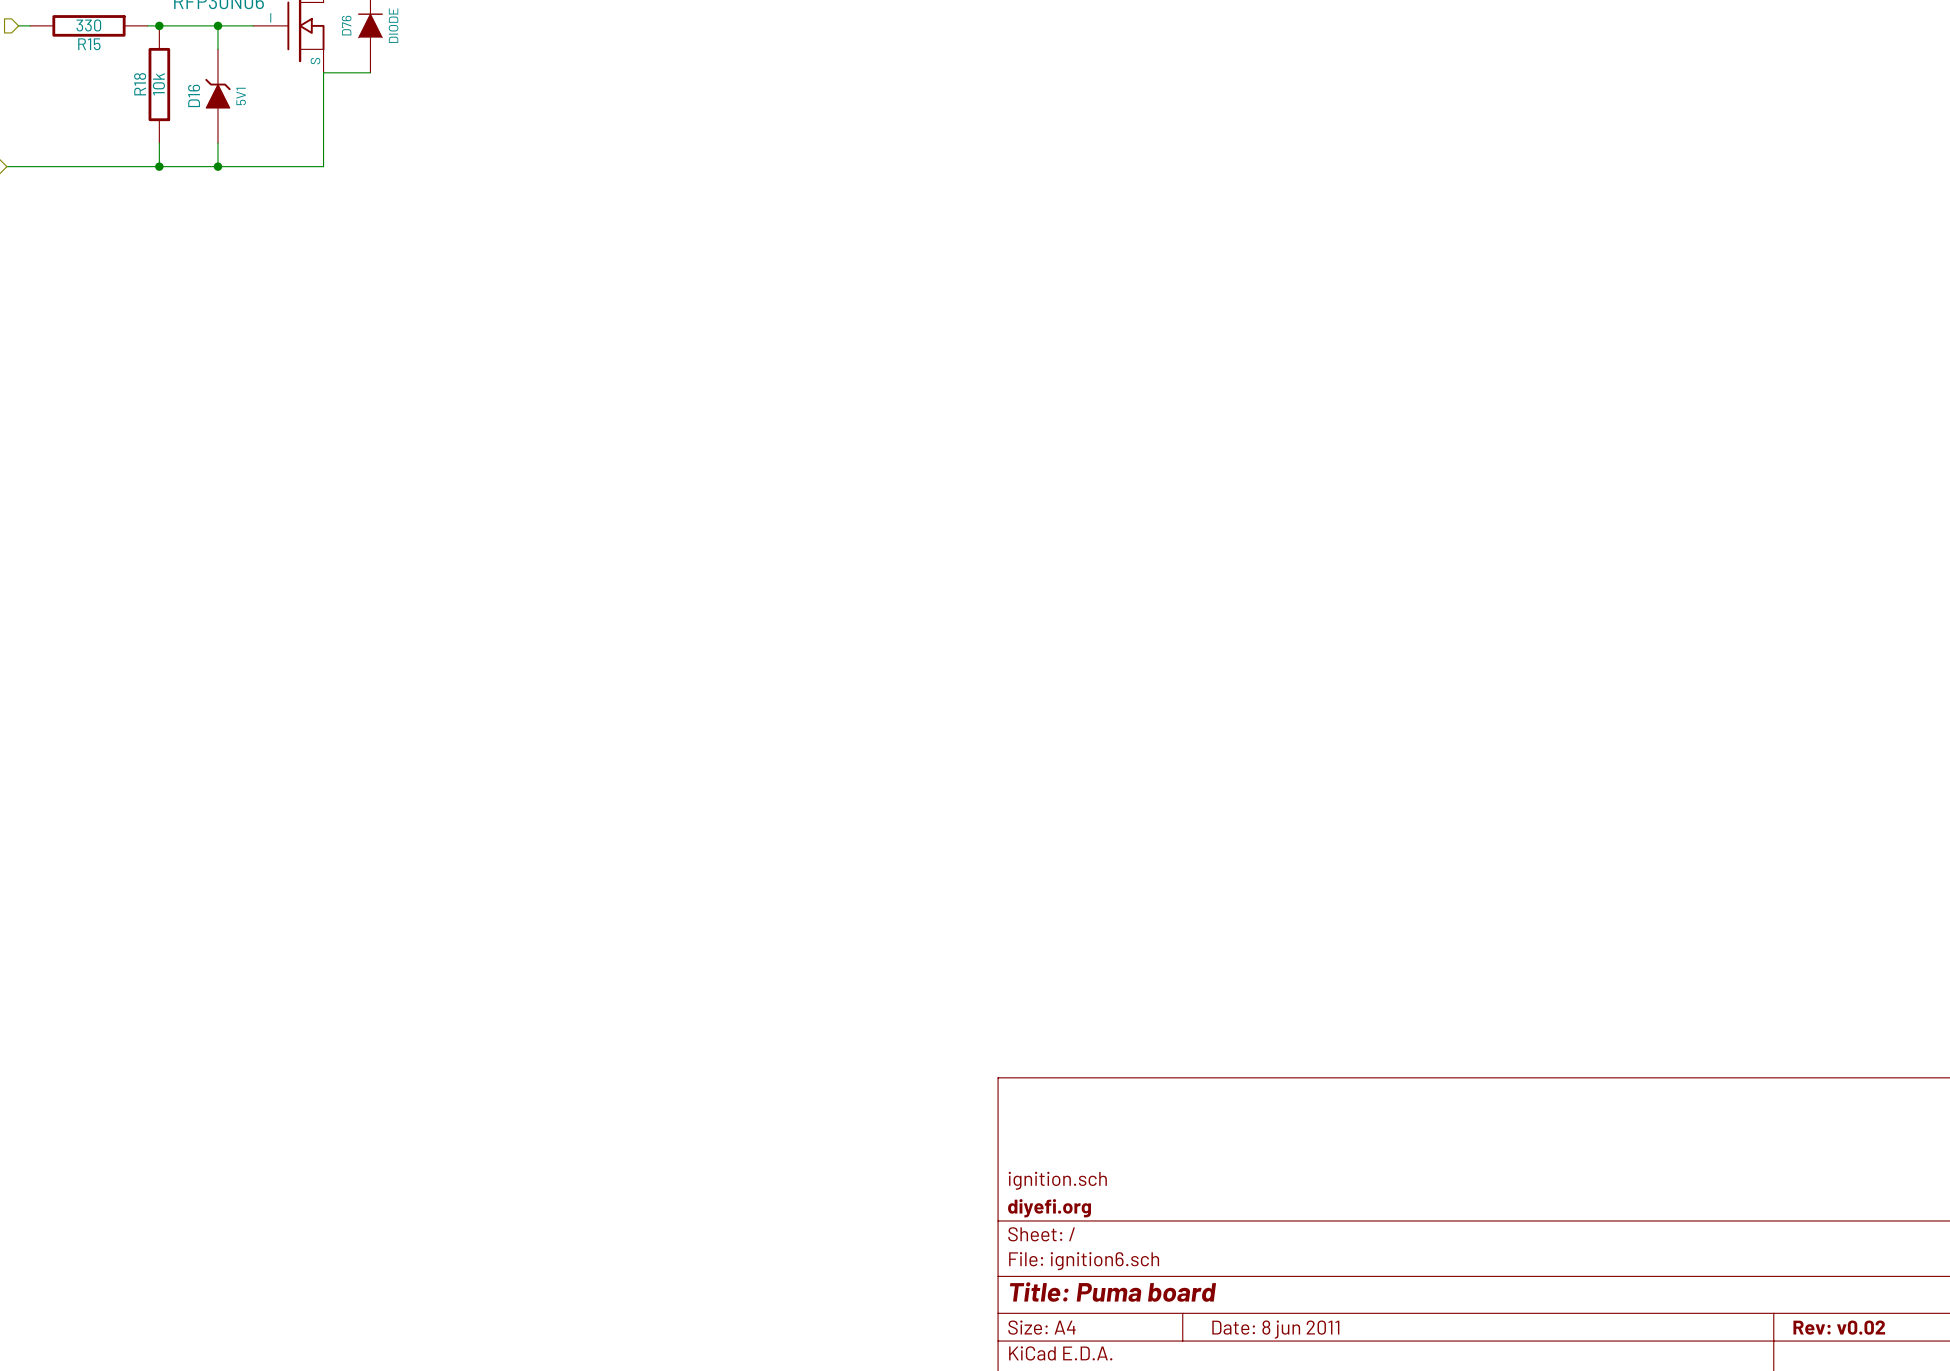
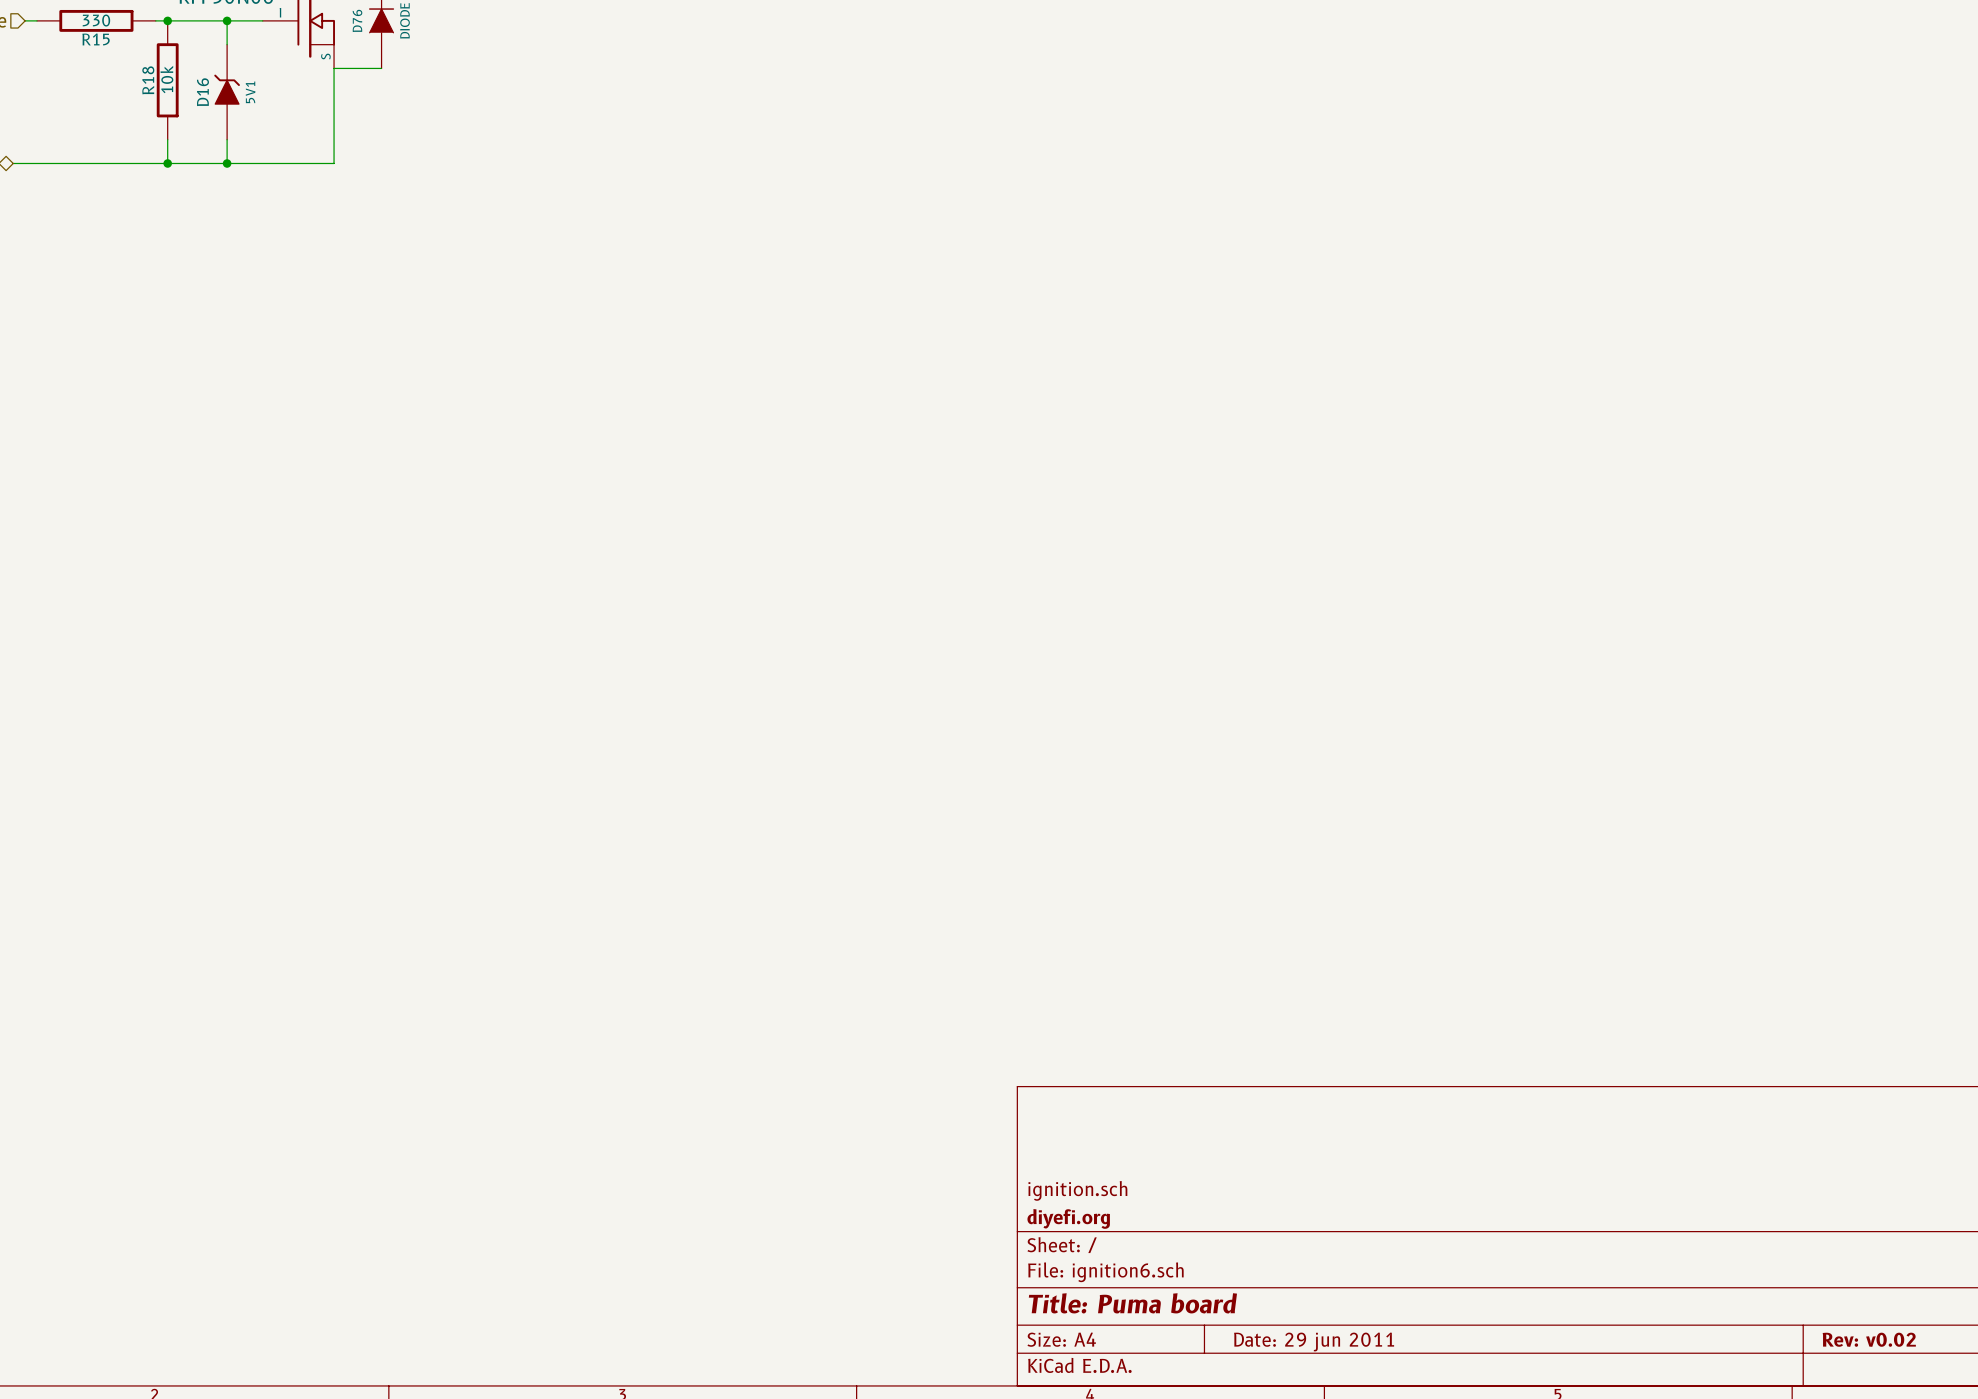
title block: Date: 8 jun 2011 (1275, 1329) -> Date: 29 jun 2011 (1314, 1341)

